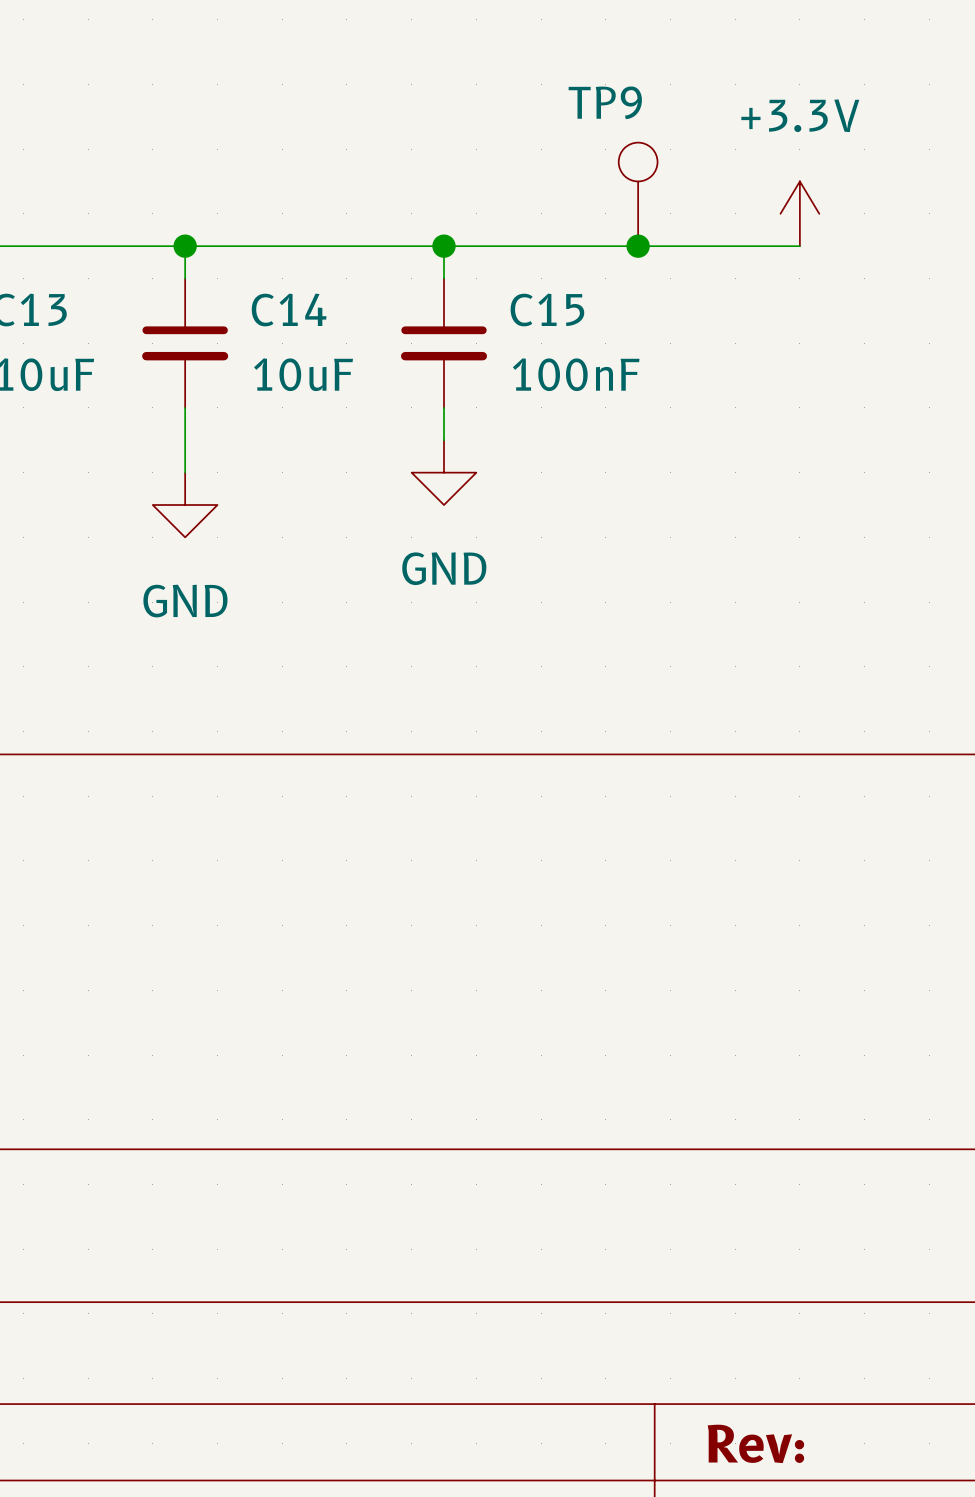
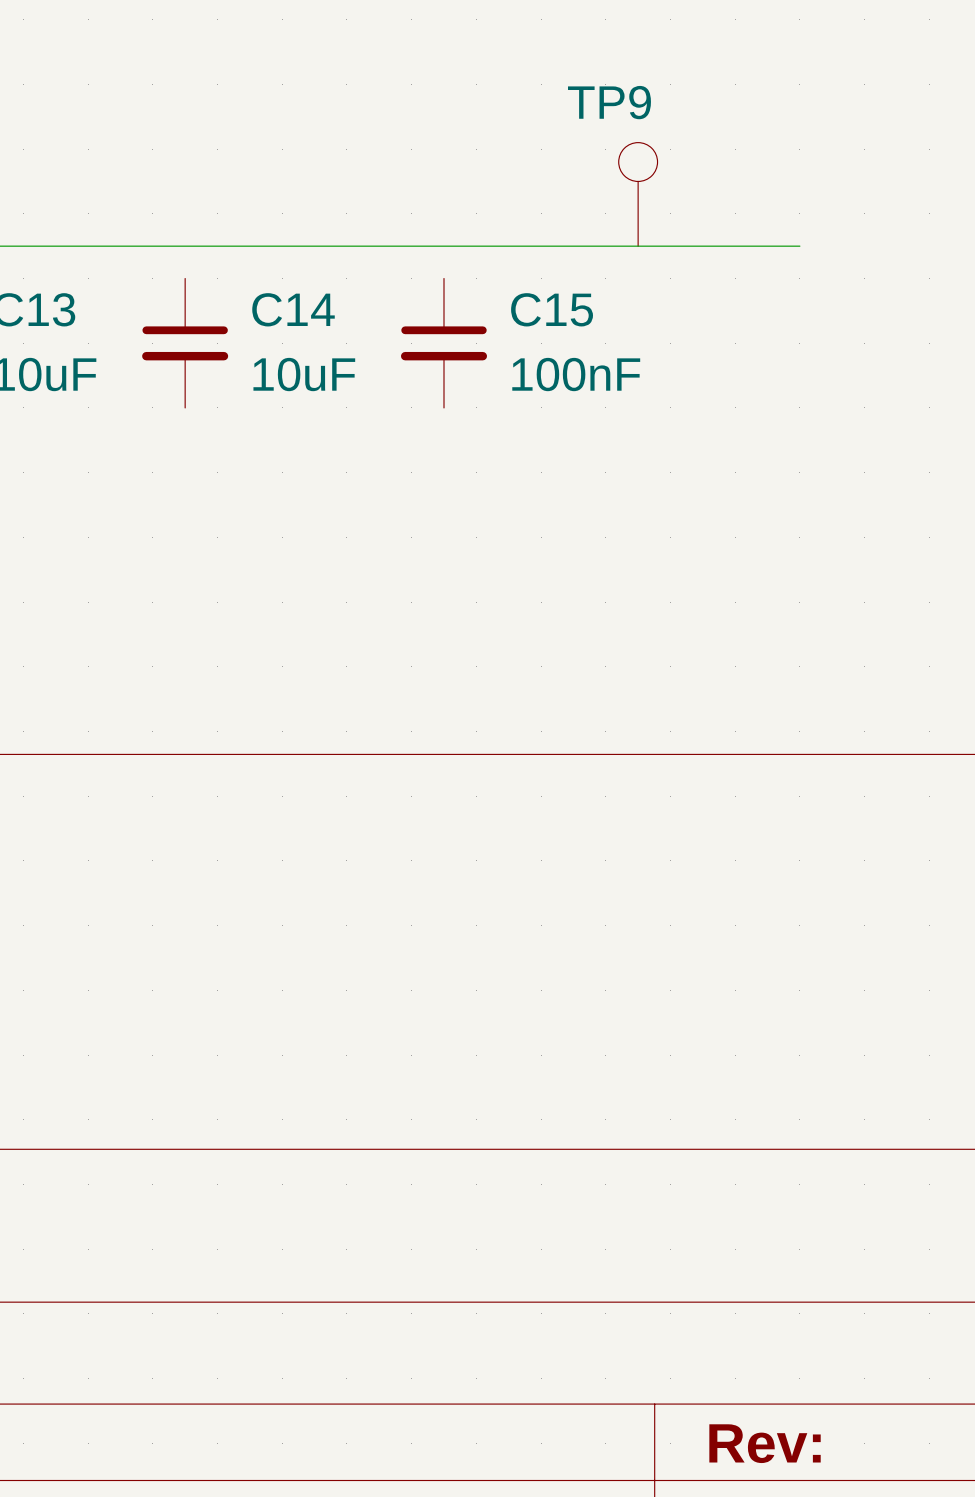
power symbol: +3.3V (799, 213) -> none
wire: (185, 246) (185, 278) -> none
junction: (185, 246) -> none
wire: (443, 246) (443, 278) -> none
junction: (443, 246) -> none
junction: (638, 246) -> none
wire: (185, 407) (185, 472) -> none
wire: (443, 407) (443, 440) -> none
power symbol: GND (443, 472) -> none
power symbol: GND (185, 505) -> none

